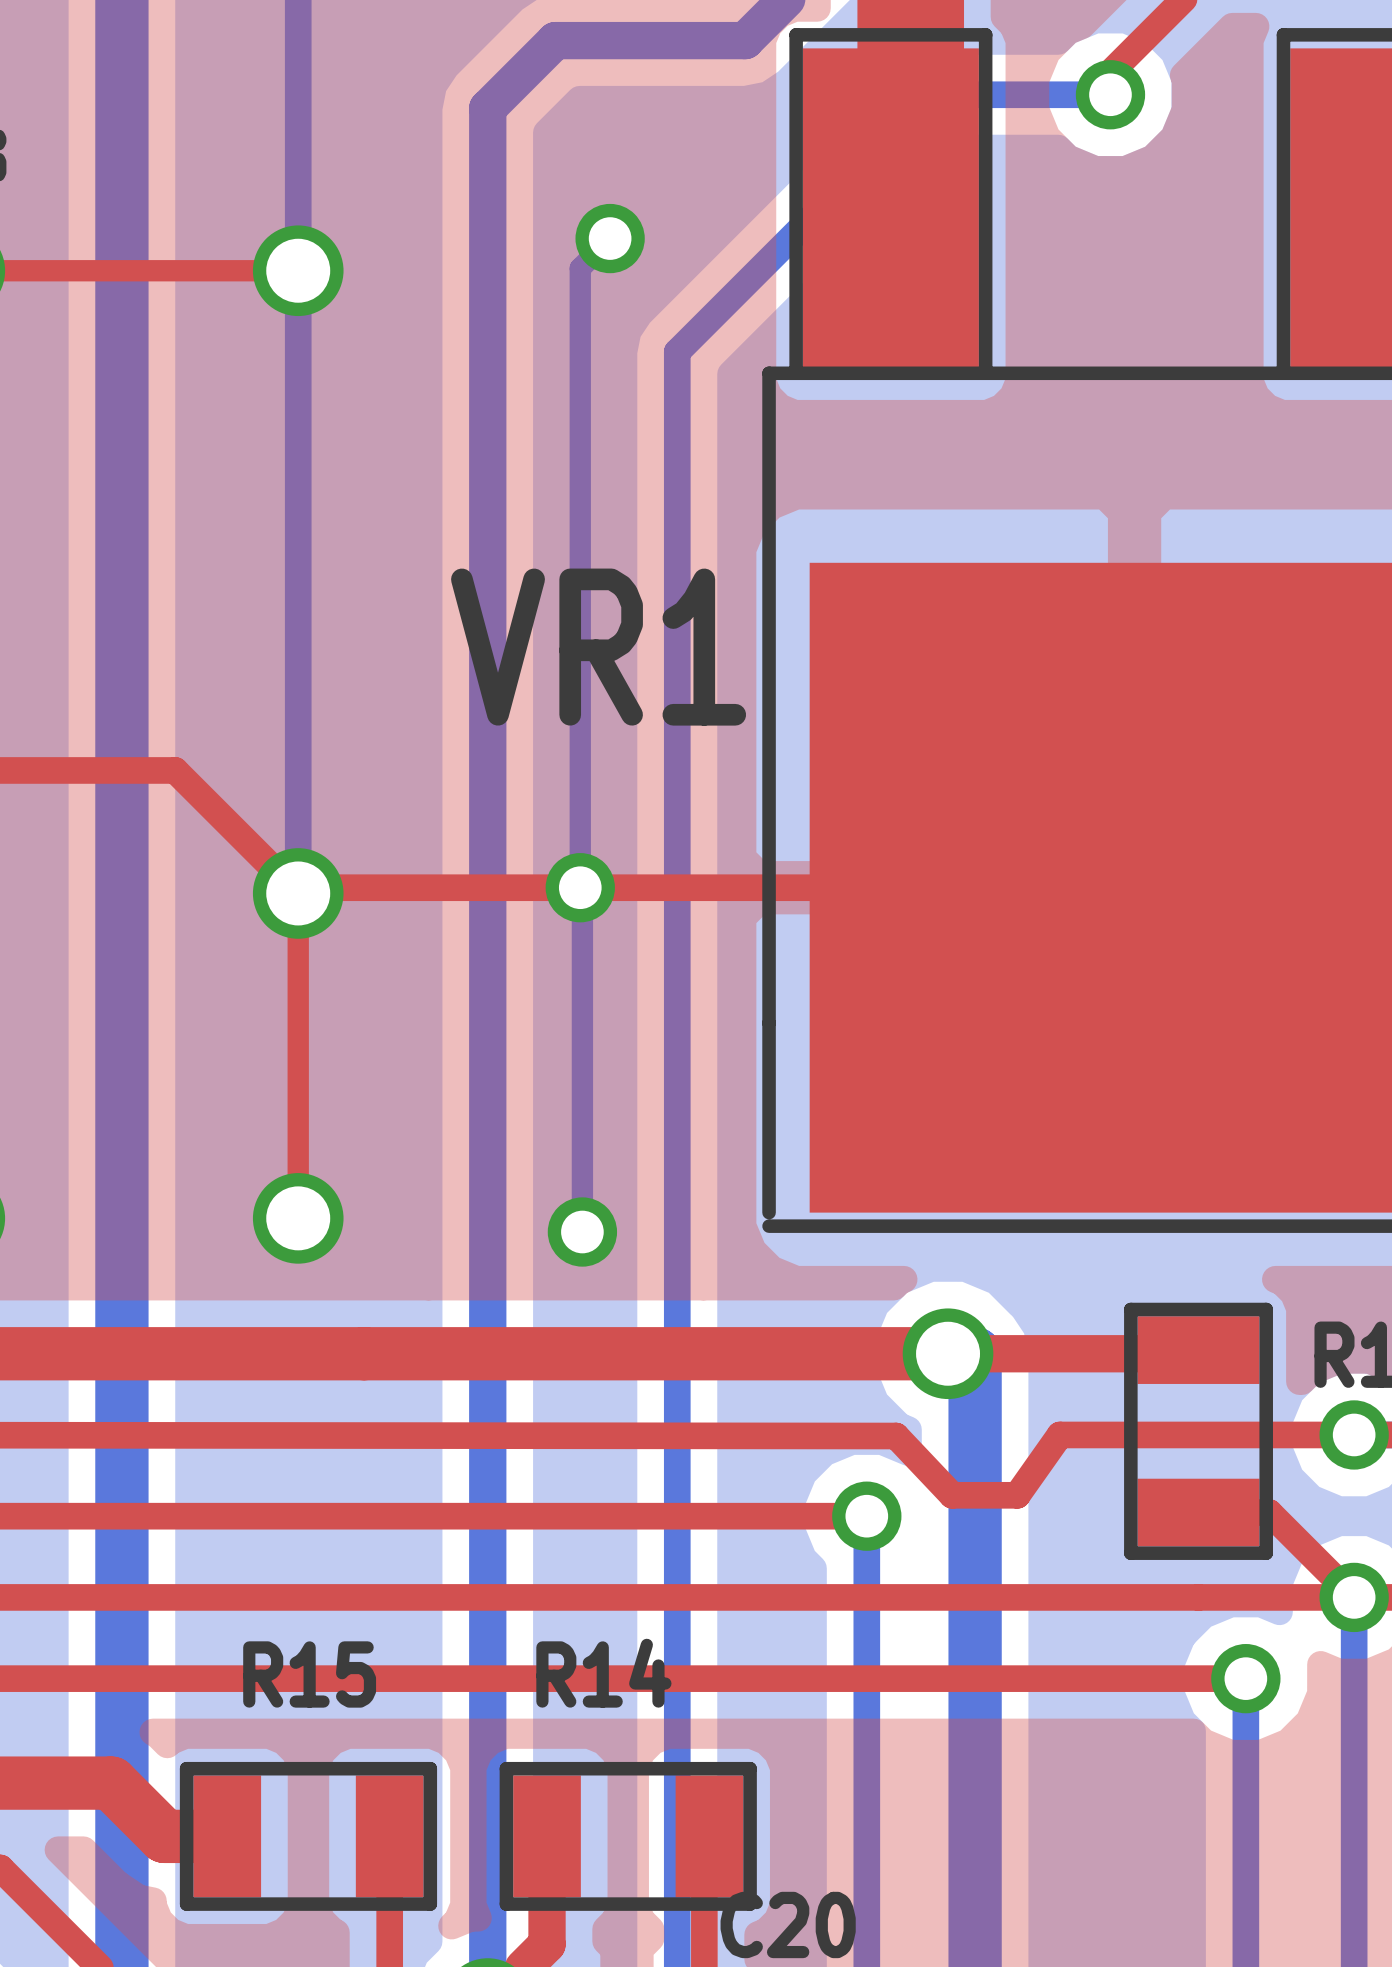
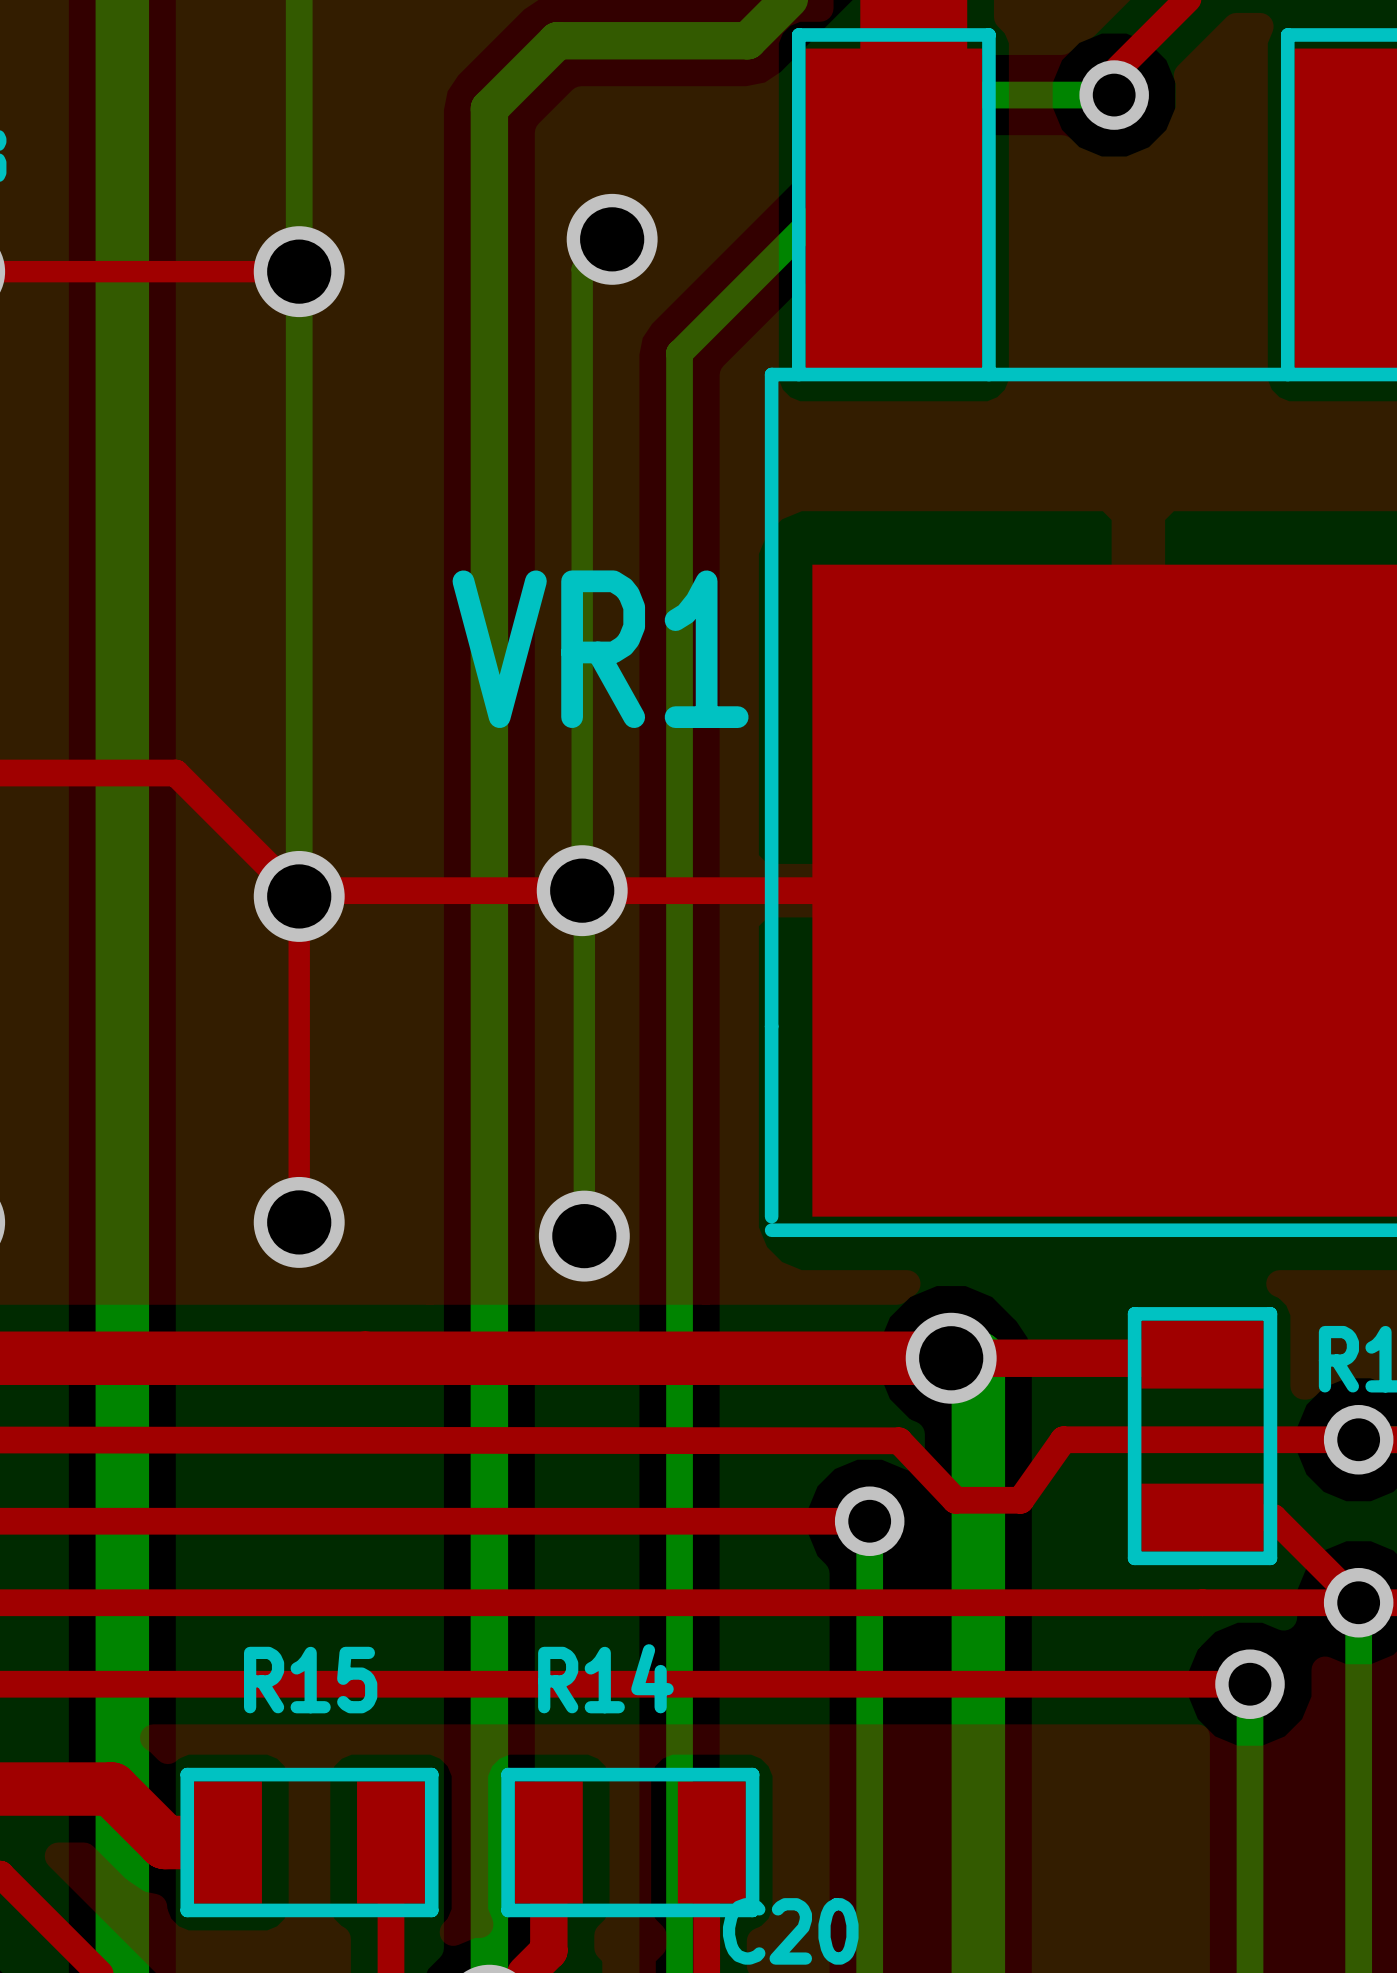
via size: [575, 203, 645, 274] -> [566, 193, 658, 285]
via size: [545, 853, 615, 923] -> [536, 845, 628, 937]
via size: [547, 1197, 618, 1267] -> [538, 1190, 630, 1282]

